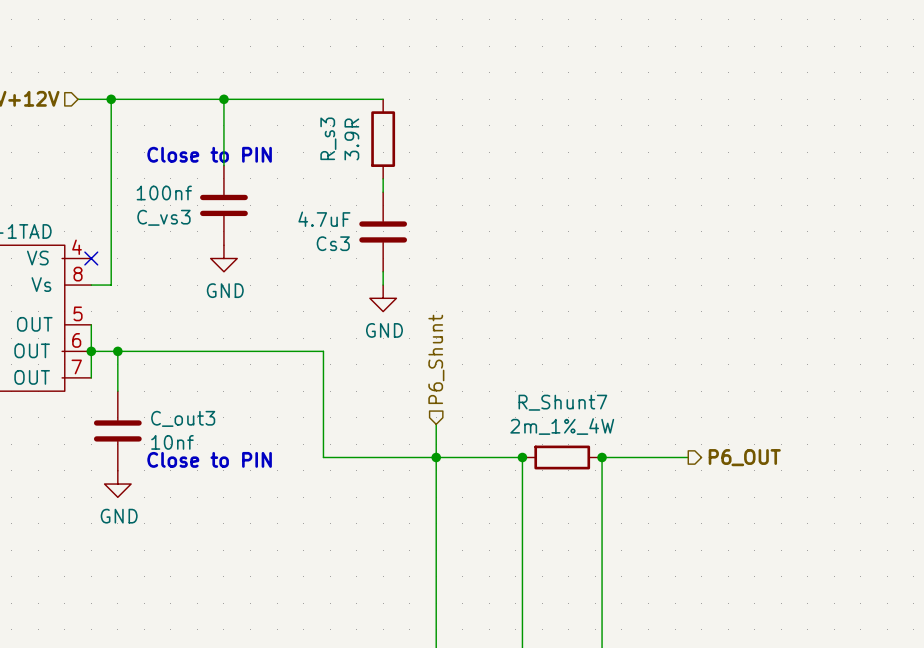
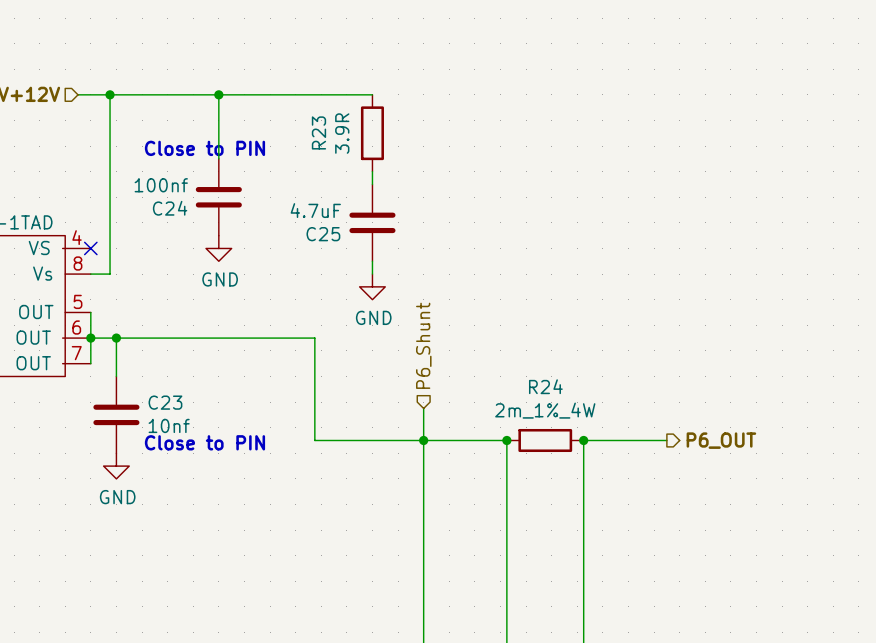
R_s3 name: R_s3 (328, 138) -> R23 (318, 132)
C_vs3 name: C_vs3 (163, 217) -> C24 (170, 208)
Cs3 name: Cs3 (333, 243) -> C25 (323, 234)
R_Shunt7 name: R_Shunt7 (562, 402) -> R24 (545, 386)
C_out3 name: C_out3 (183, 418) -> C23 (165, 402)

